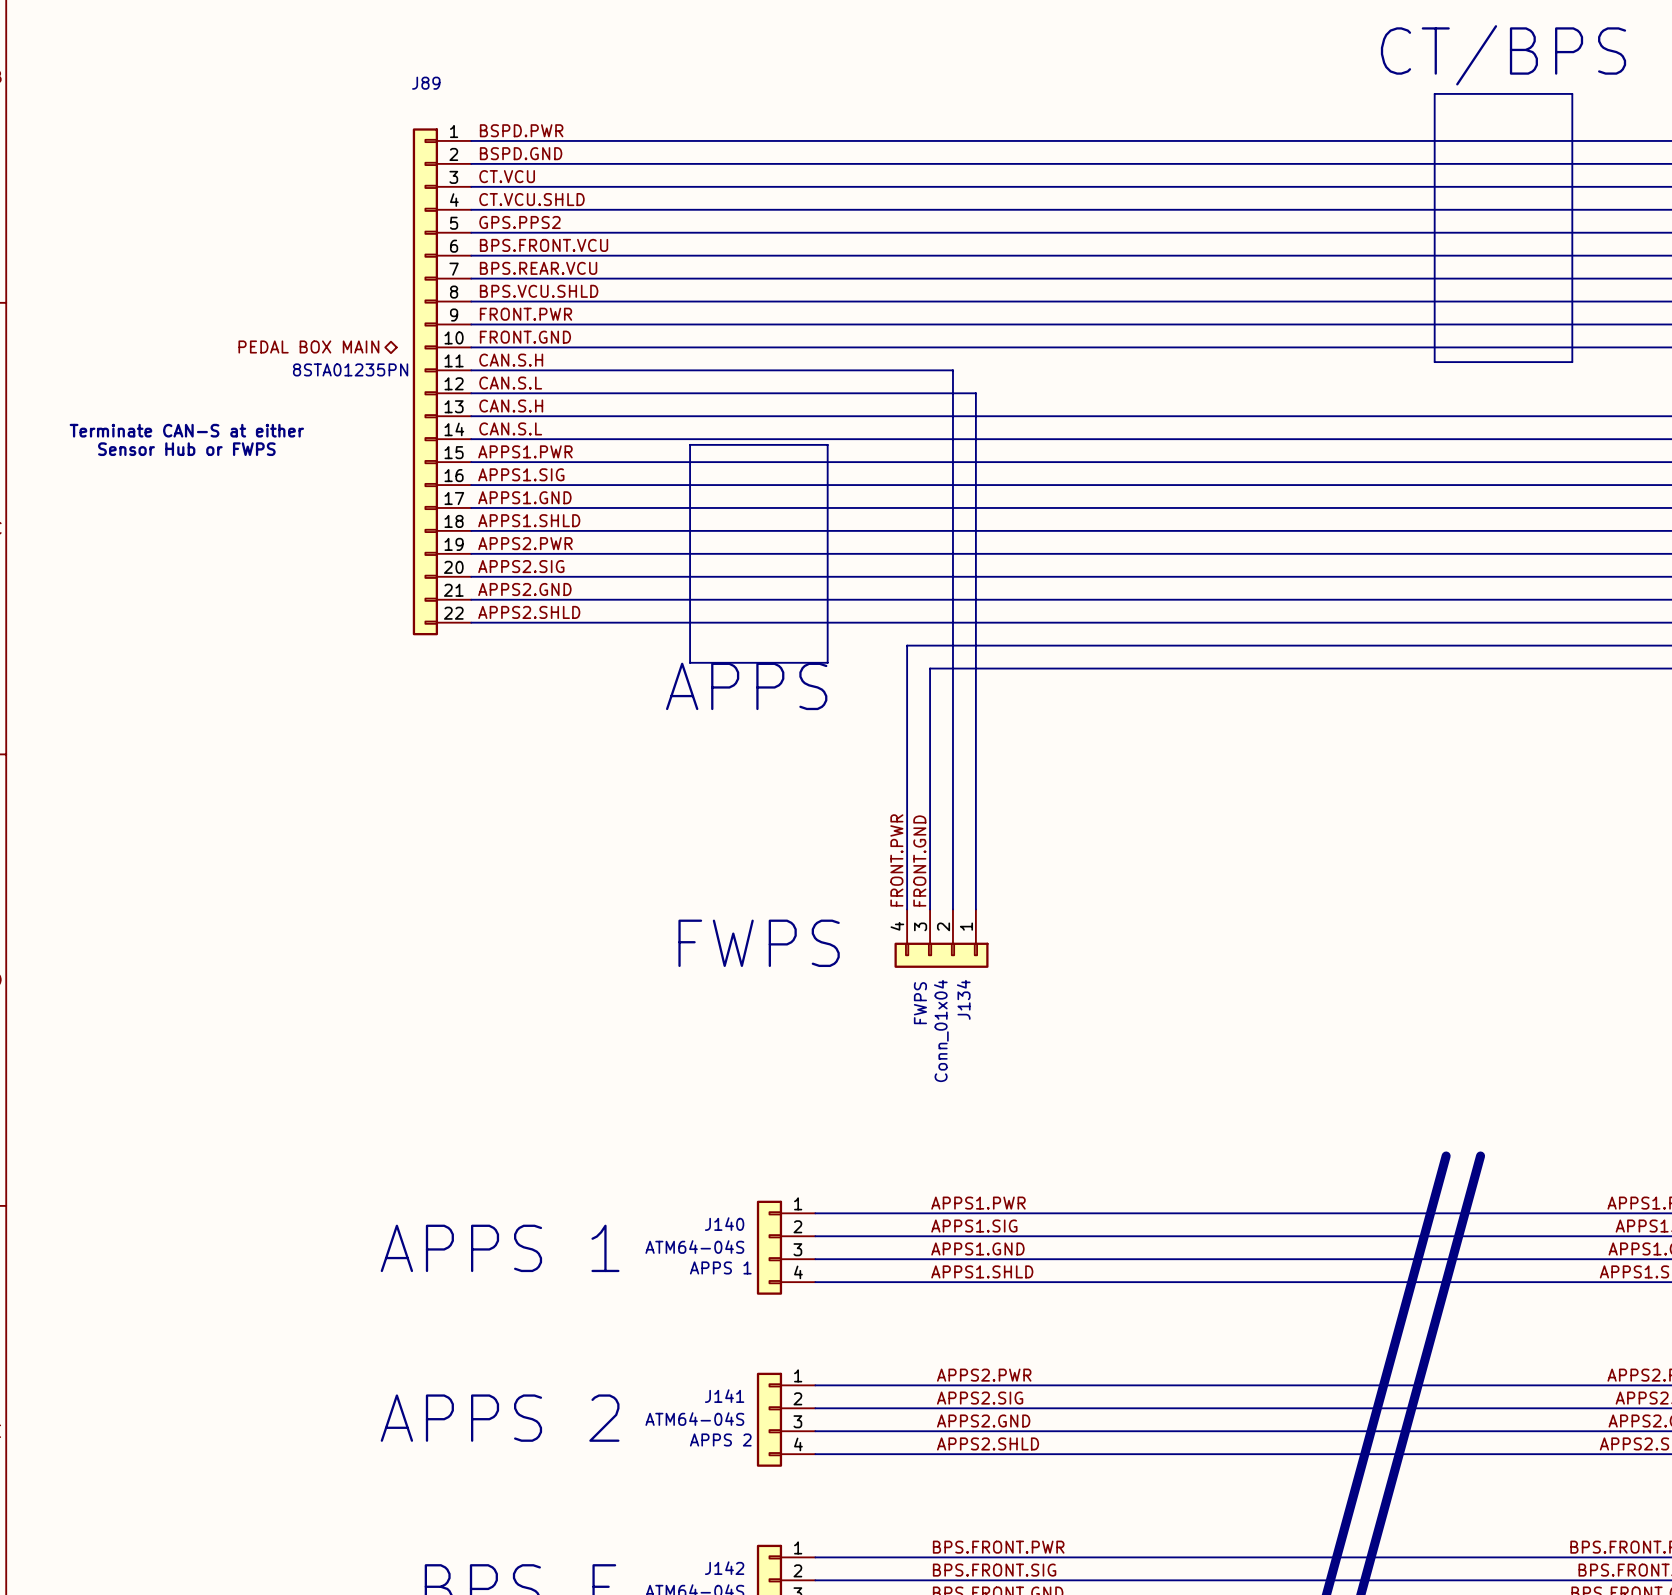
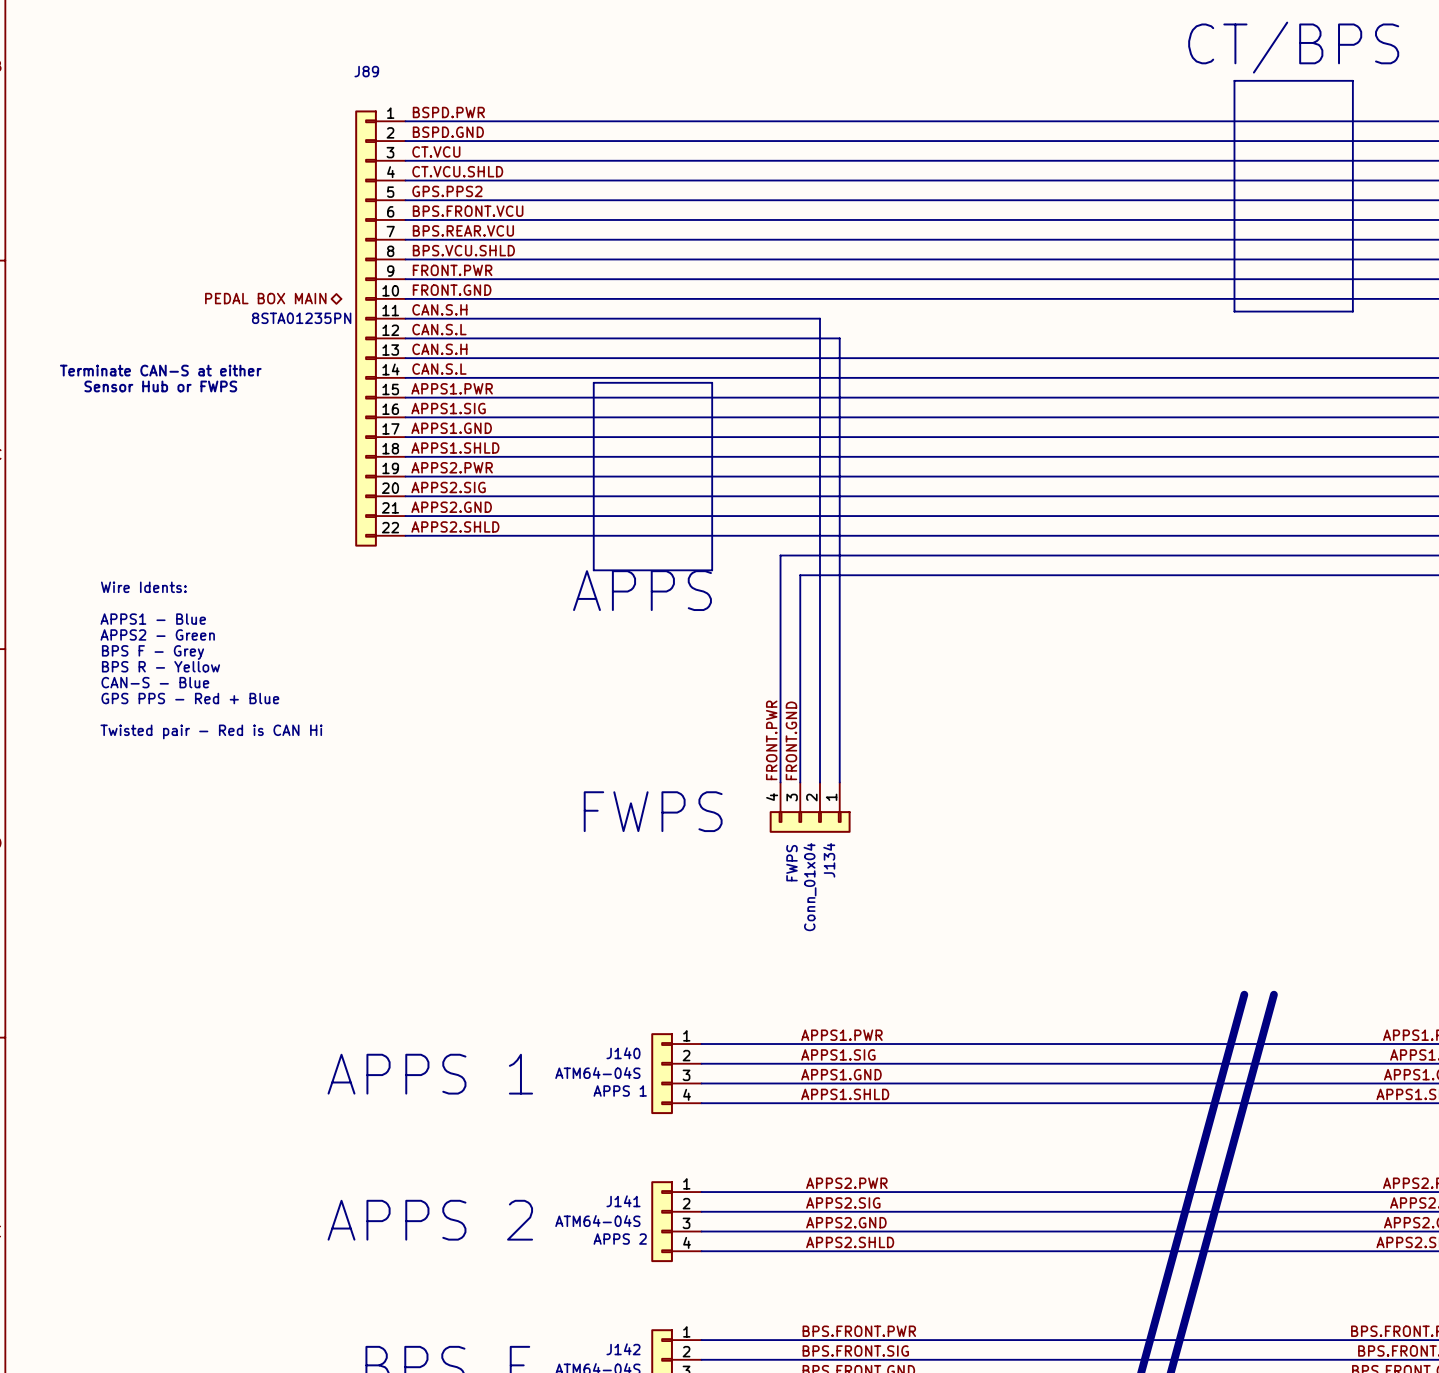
text: none -> Wire Idents: (143, 587)
text: none -> APPS1 - Blue (153, 619)
text: none -> APPS2 - Green (157, 634)
text: none -> BPS F - Grey (153, 652)
text: none -> BPS R - Yellow (160, 666)
text: none -> CAN-S - Blue (155, 682)
text: none -> GPS PPS - Red + Blue (190, 698)
text: none -> Twisted pair - Red is CAN Hi (211, 731)

